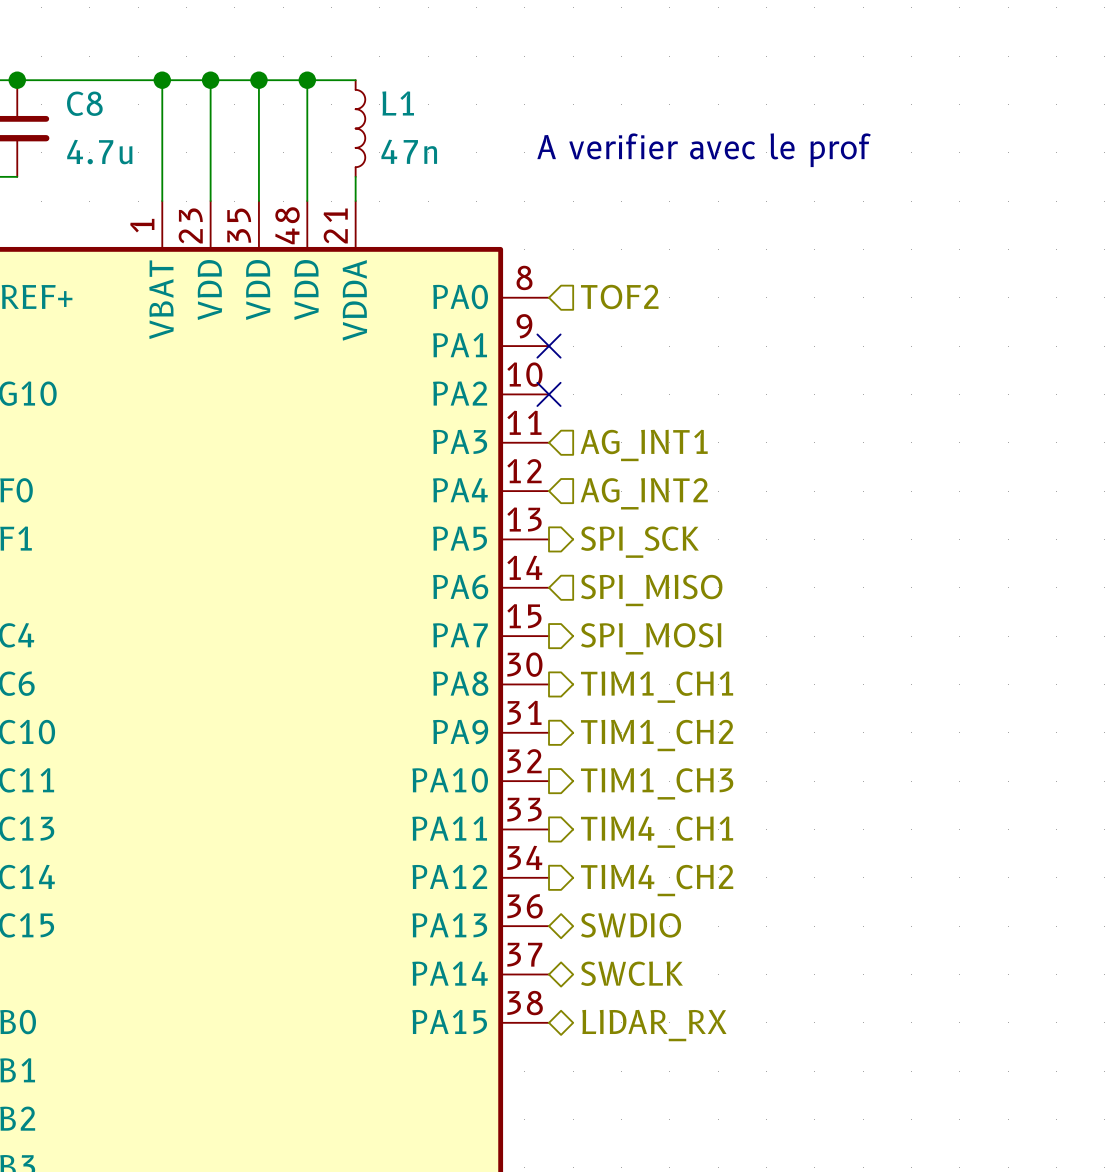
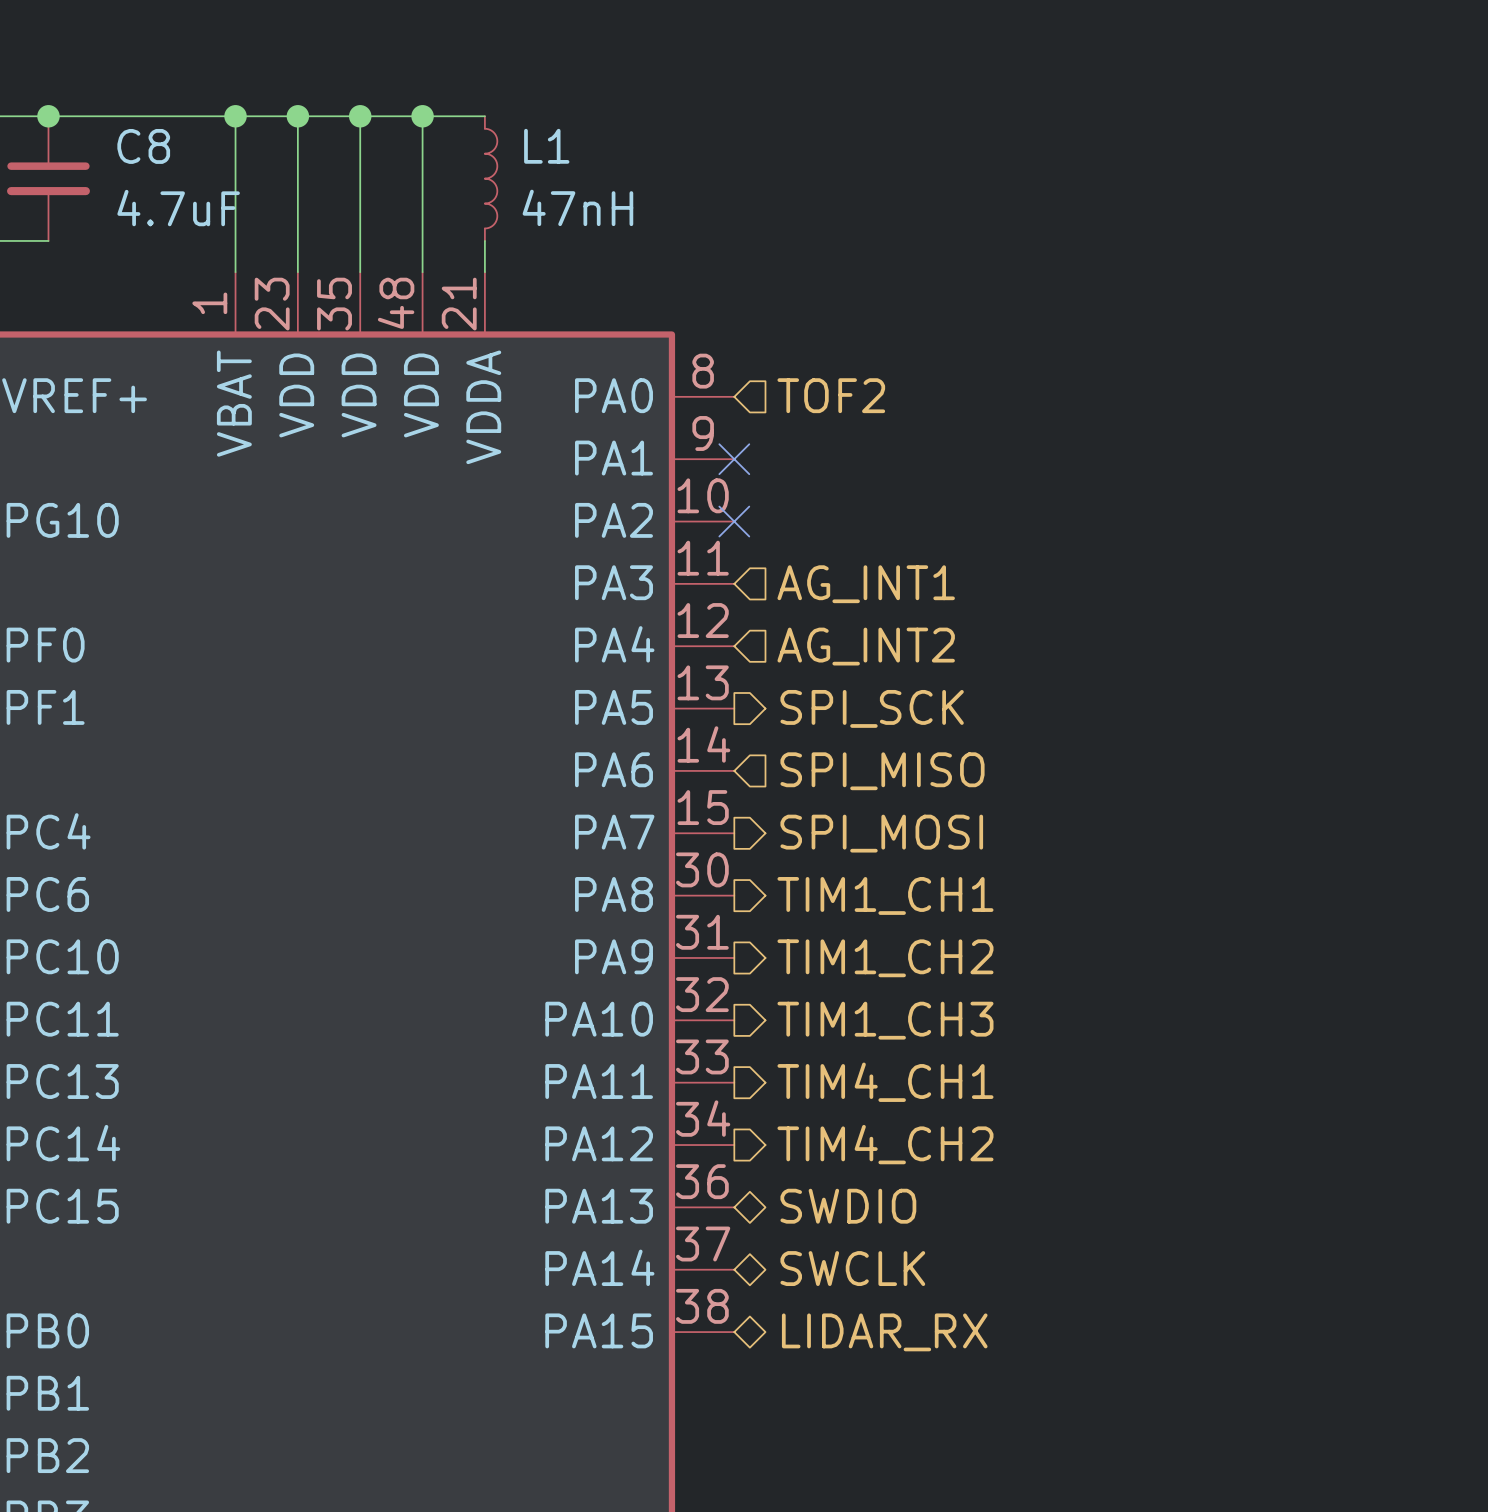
text: A verifier avec le prof (704, 150) -> none
L1 value: 47n (409, 151) -> 47nH (577, 207)
C8 value: 4.7u (99, 152) -> 4.7uF (178, 208)

